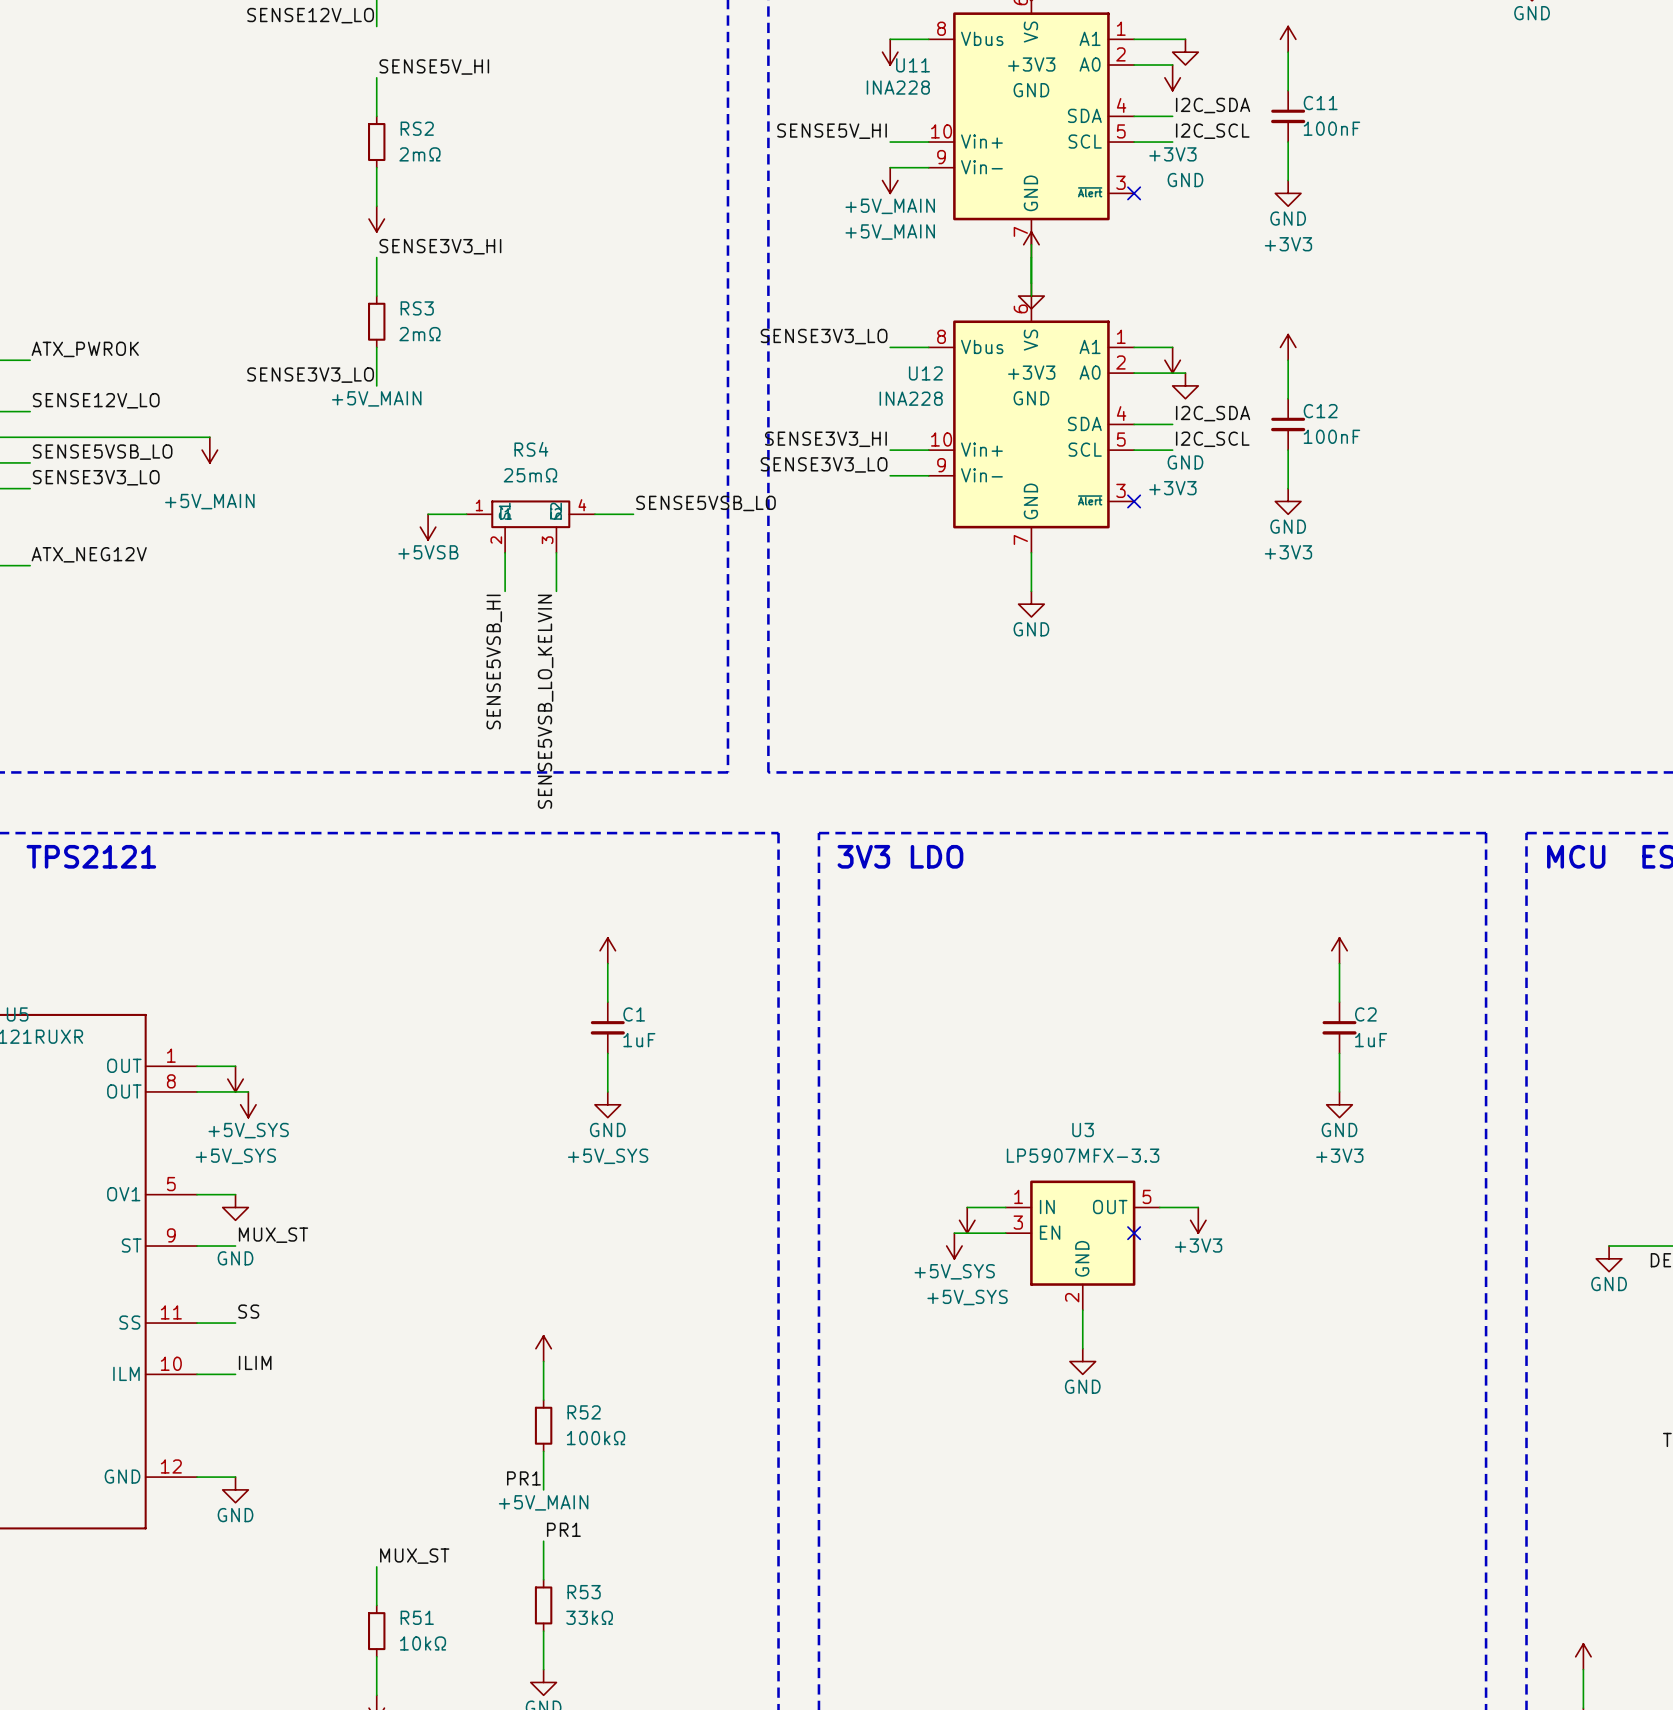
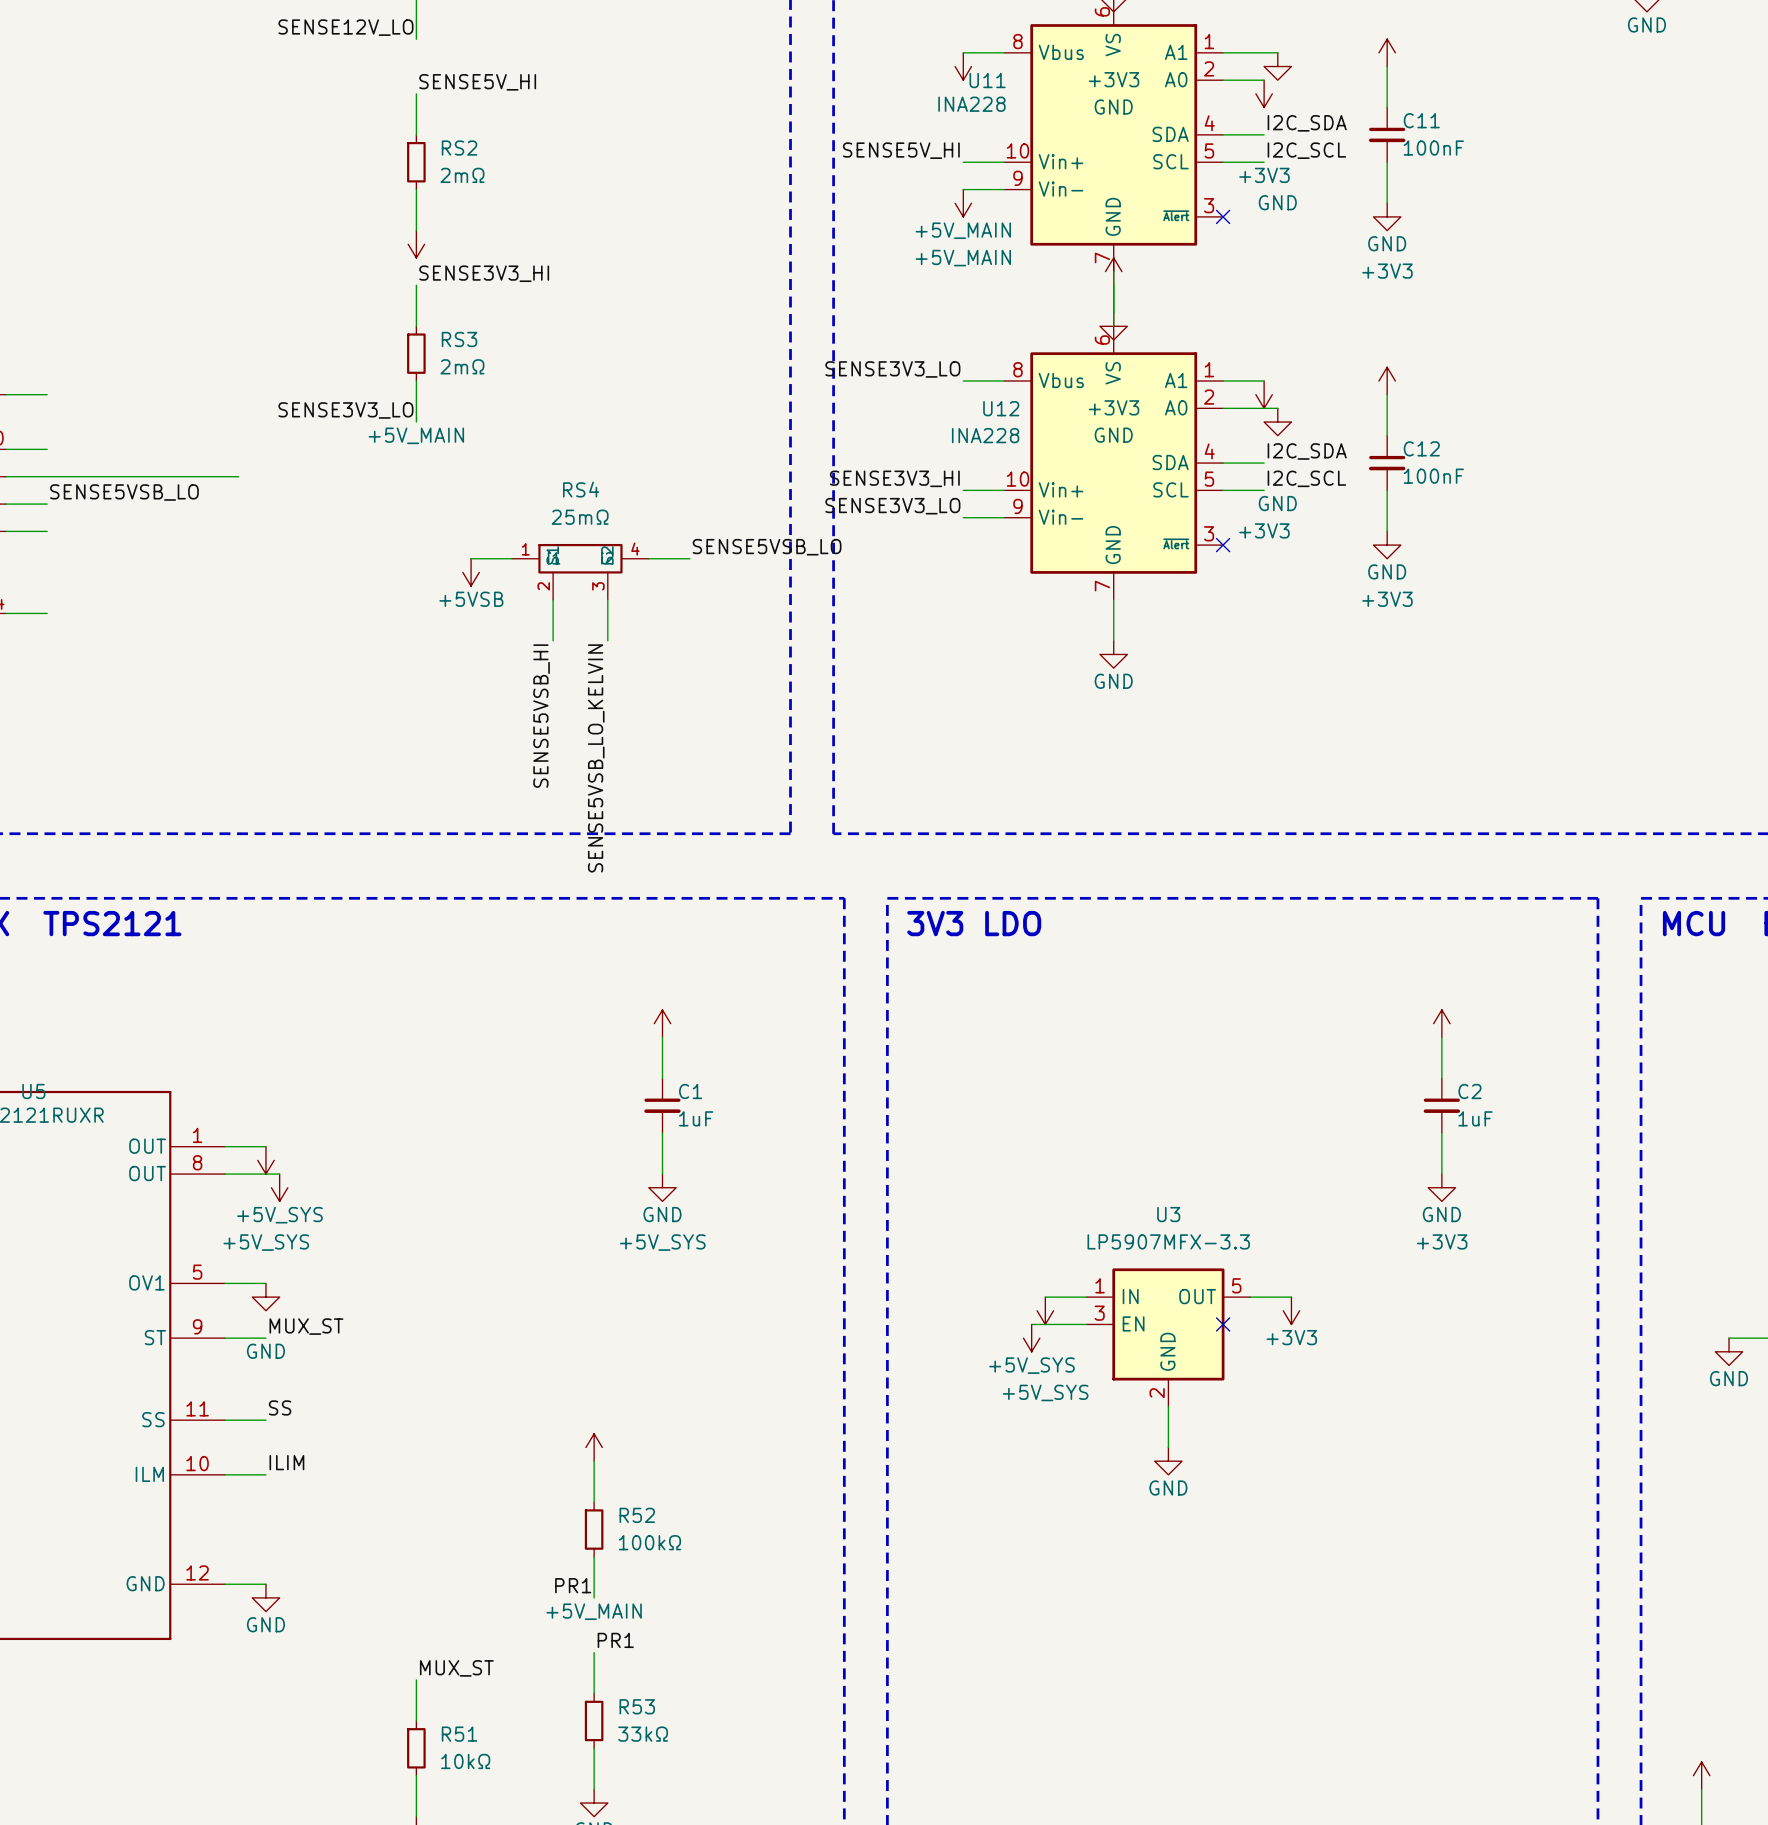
label: ATX_PWROK (85, 349) -> none
label: SENSE12V_LO (96, 400) -> none
power symbol: +5V_MAIN (209, 450) -> none
label: SENSE3V3_LO (96, 477) -> none
label: ATX_NEG12V (89, 554) -> none

